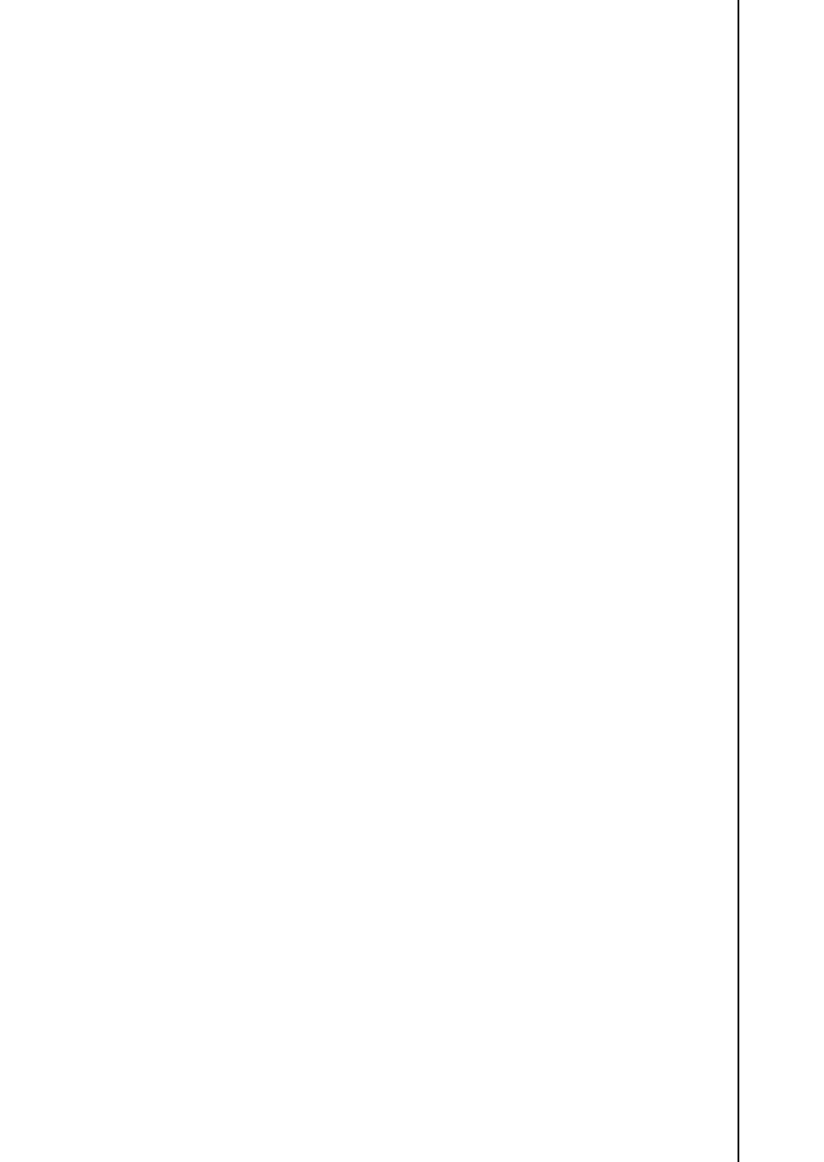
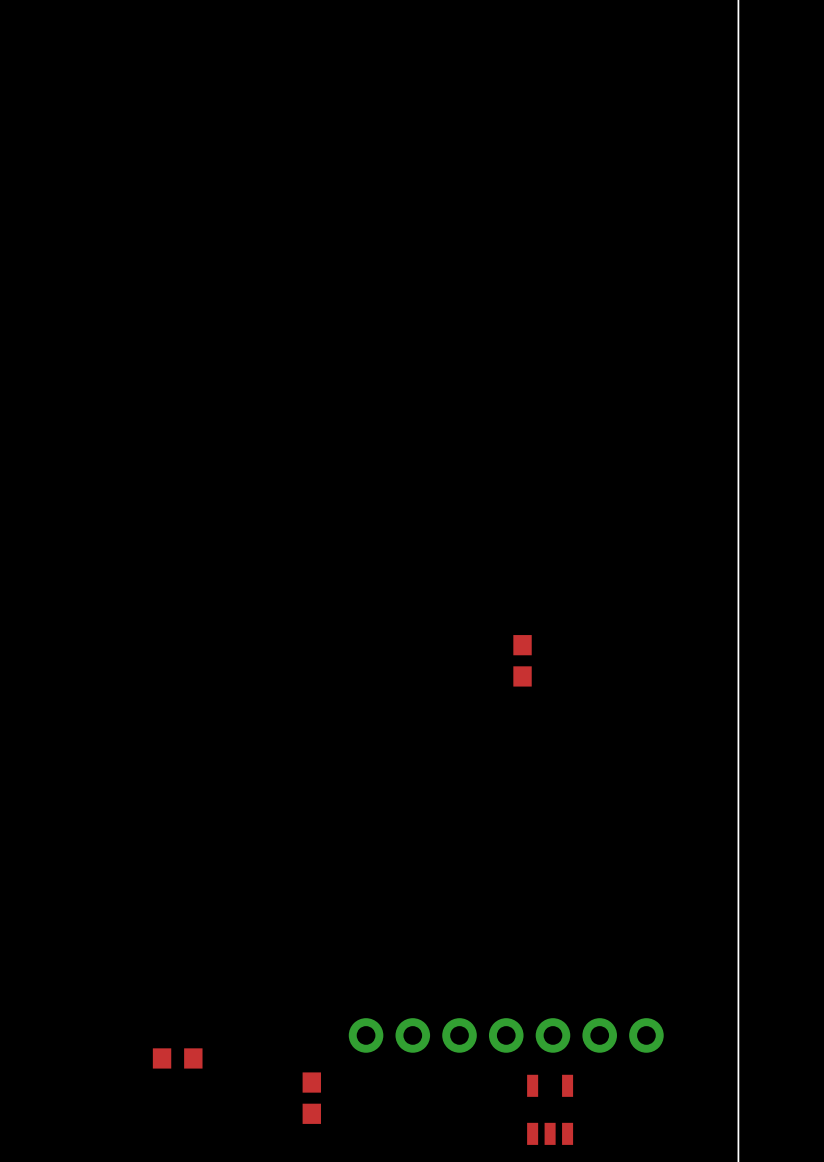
part: none -> (522, 660)
part: none -> (506, 1035)
part: none -> (177, 1058)
part: none -> (311, 1098)
part: none -> (550, 1109)

